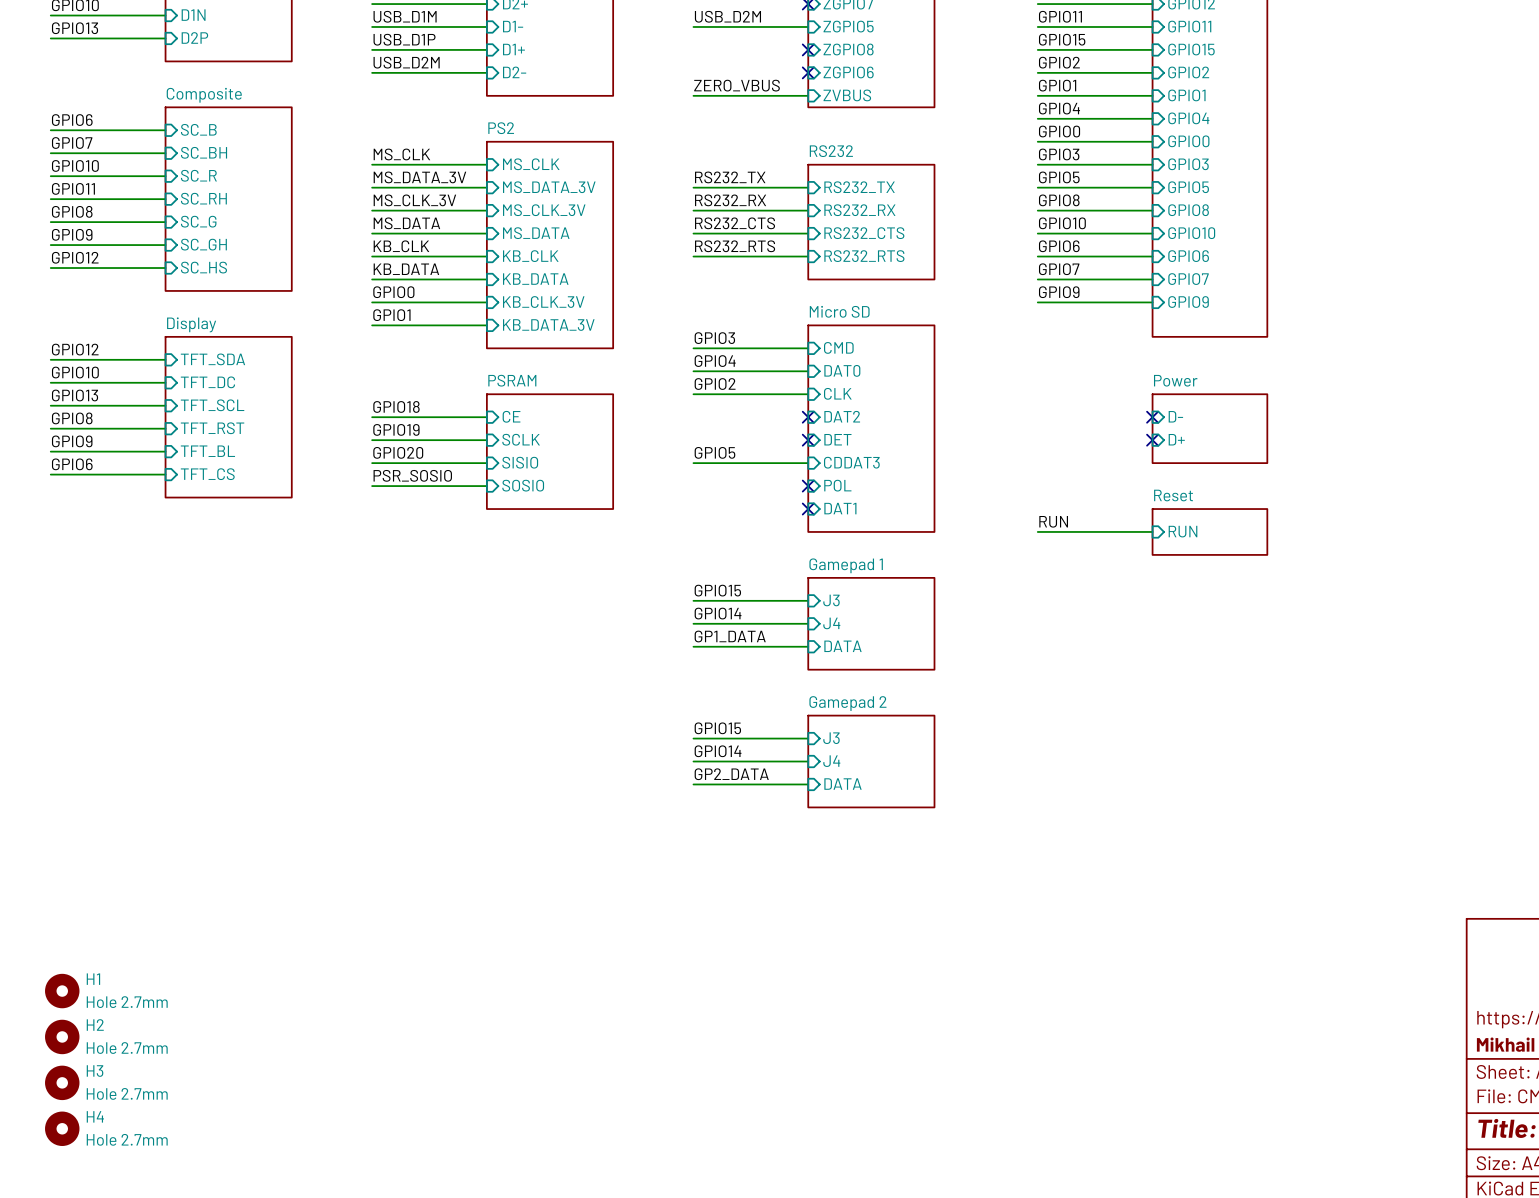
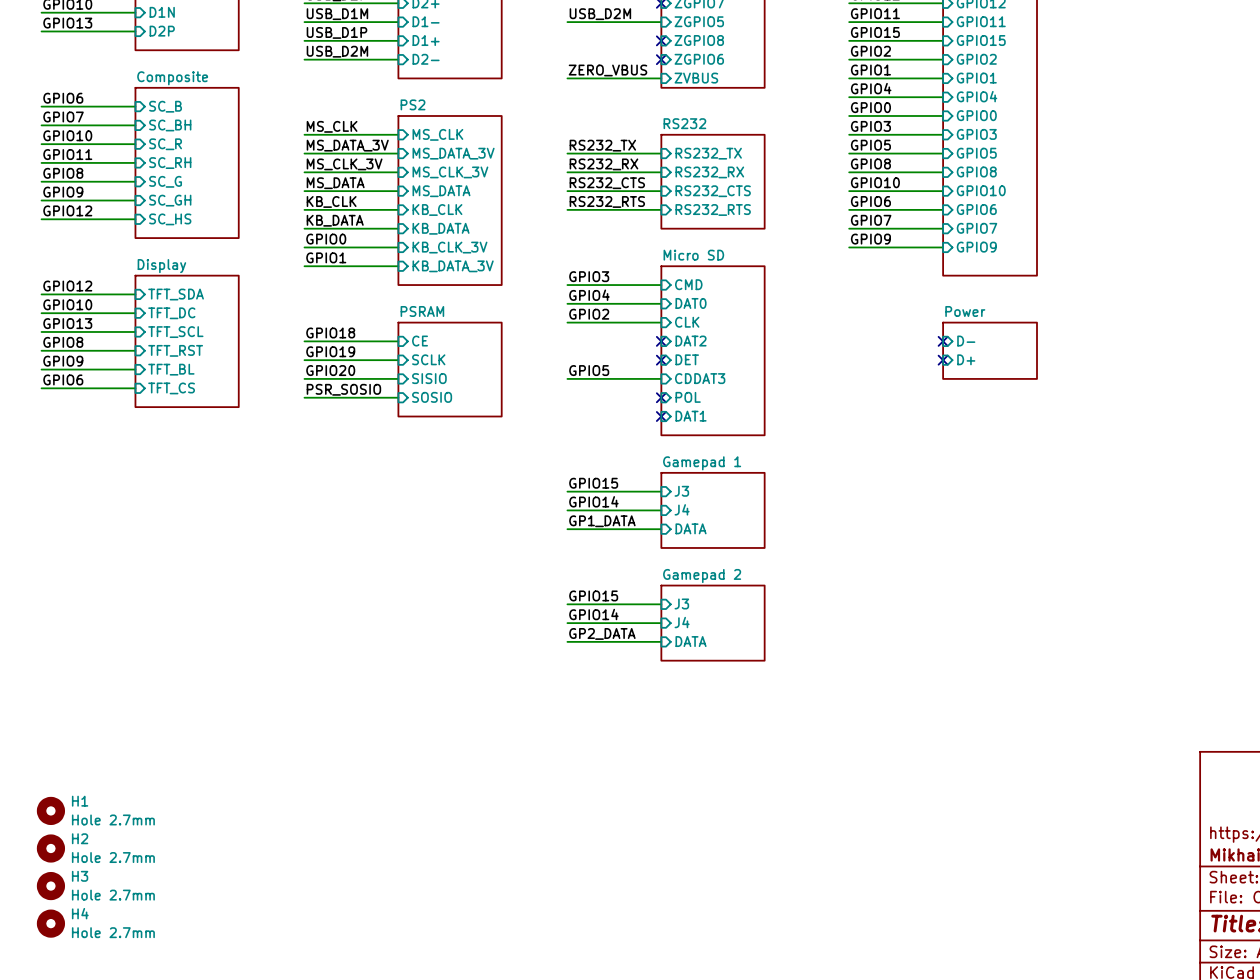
label: RUN (1053, 521) -> none
wire: (1037, 531) (1152, 531) -> none
sheet pin: RUN (1183, 531) -> none
sheet Reset: (1209, 531) -> none

